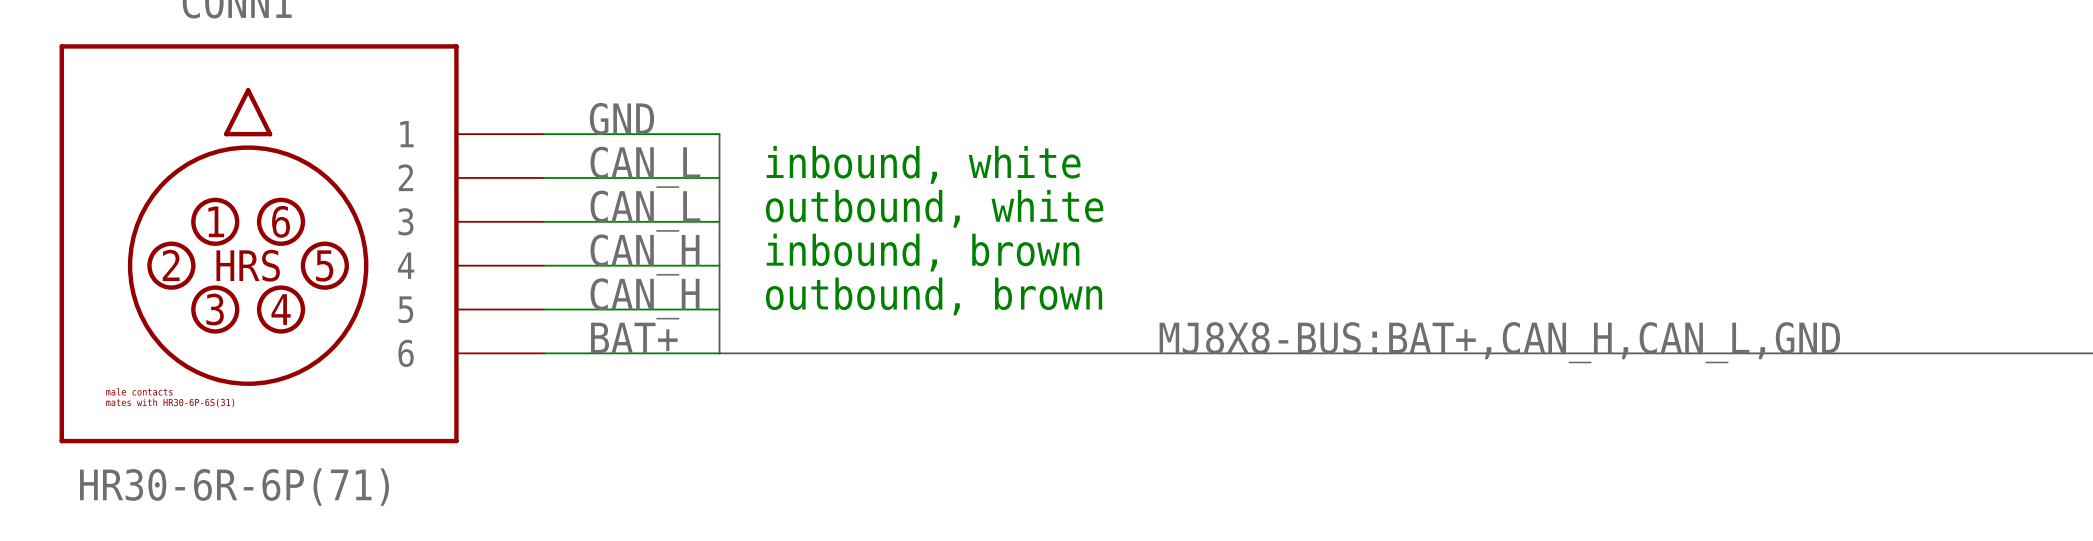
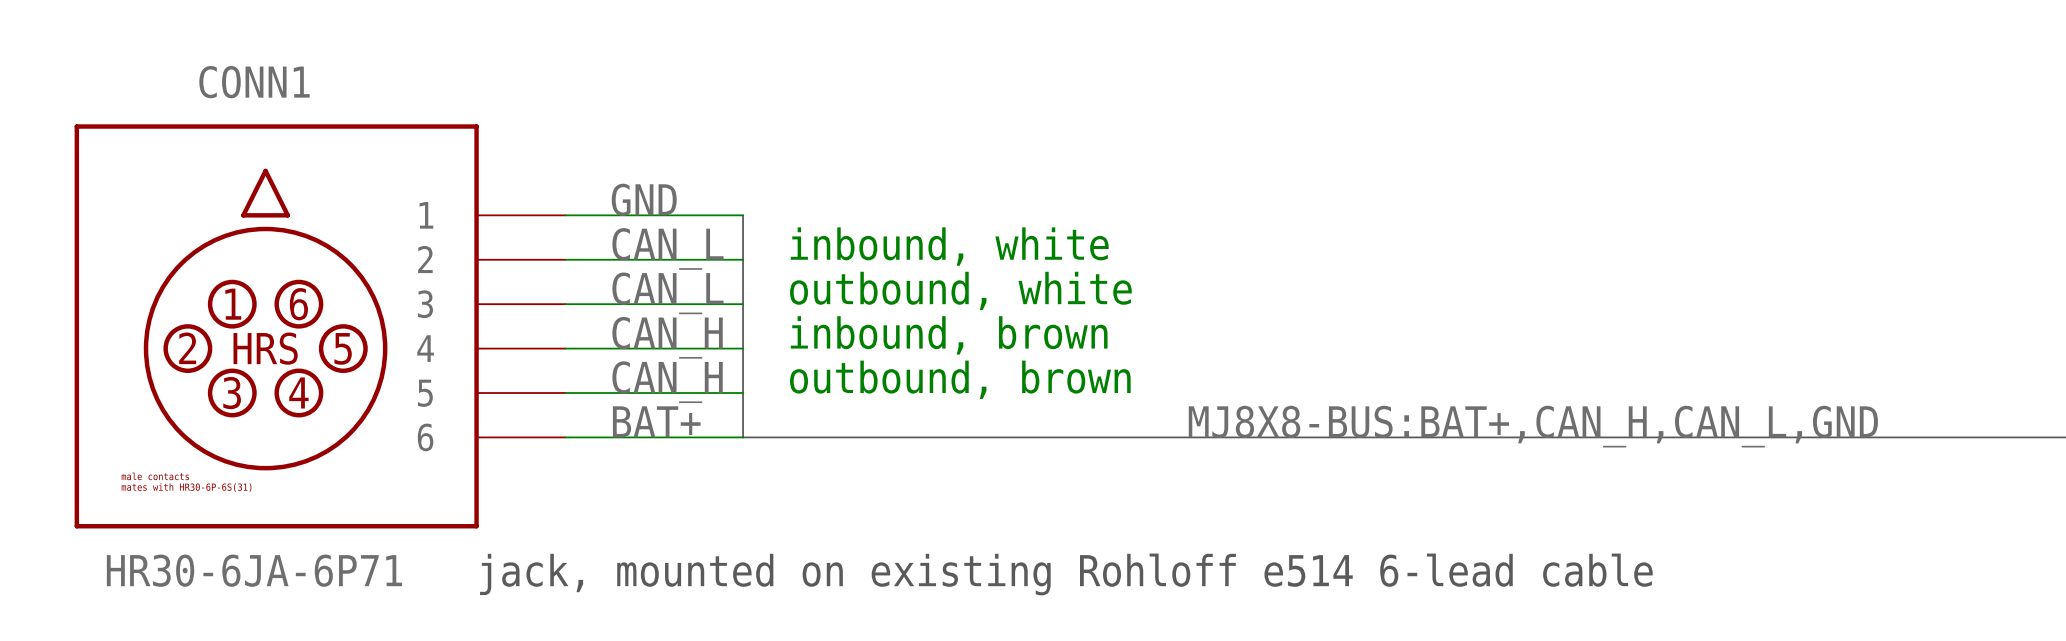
CONN1 value: HR30-6R-6P(71) (234, 487) -> HR30-6JA-6P71 (254, 570)
text: none -> jack, mounted on existing Rohloff e514 6-lead cable (1066, 574)

